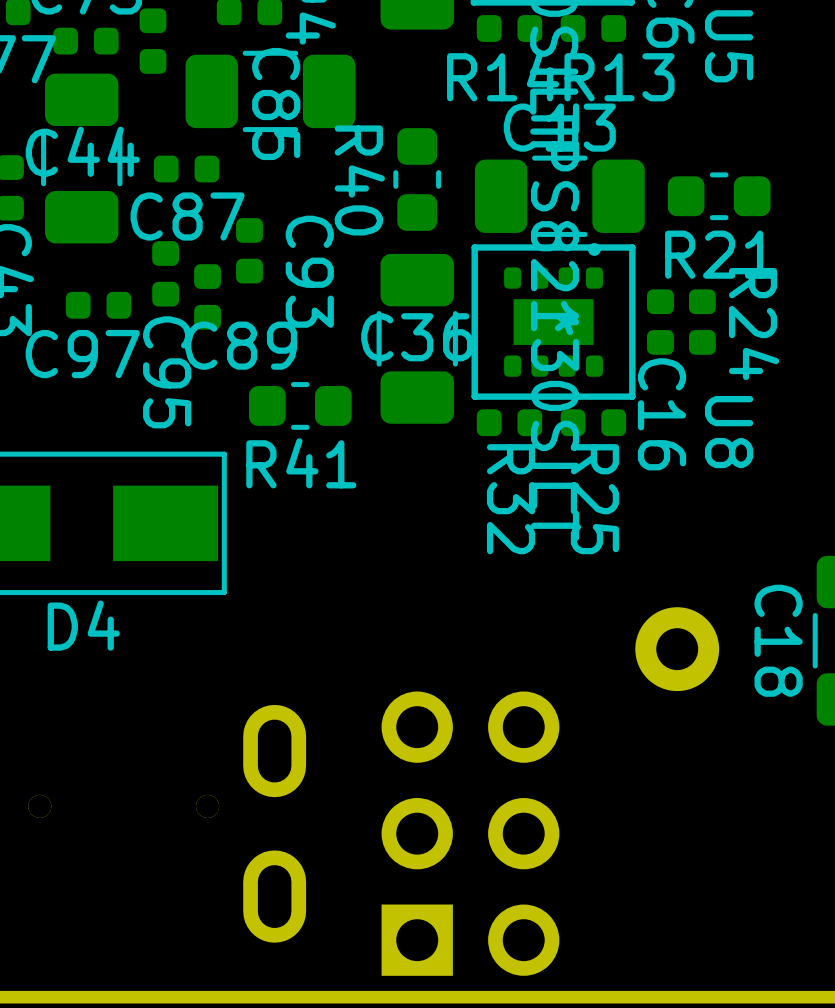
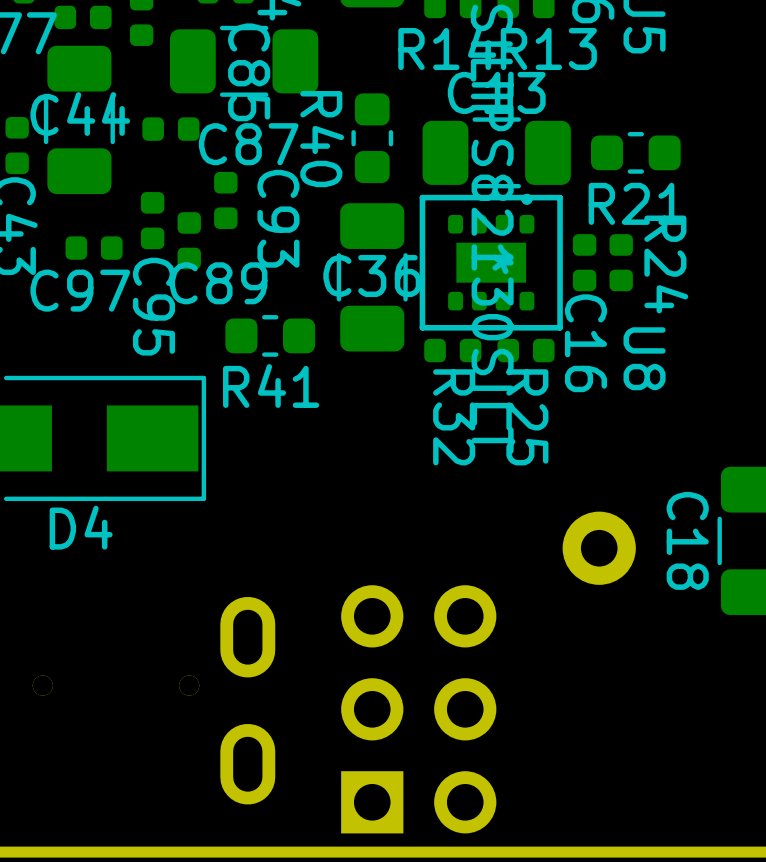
C87 name position: C87 (187, 216) -> C87 (248, 144)

